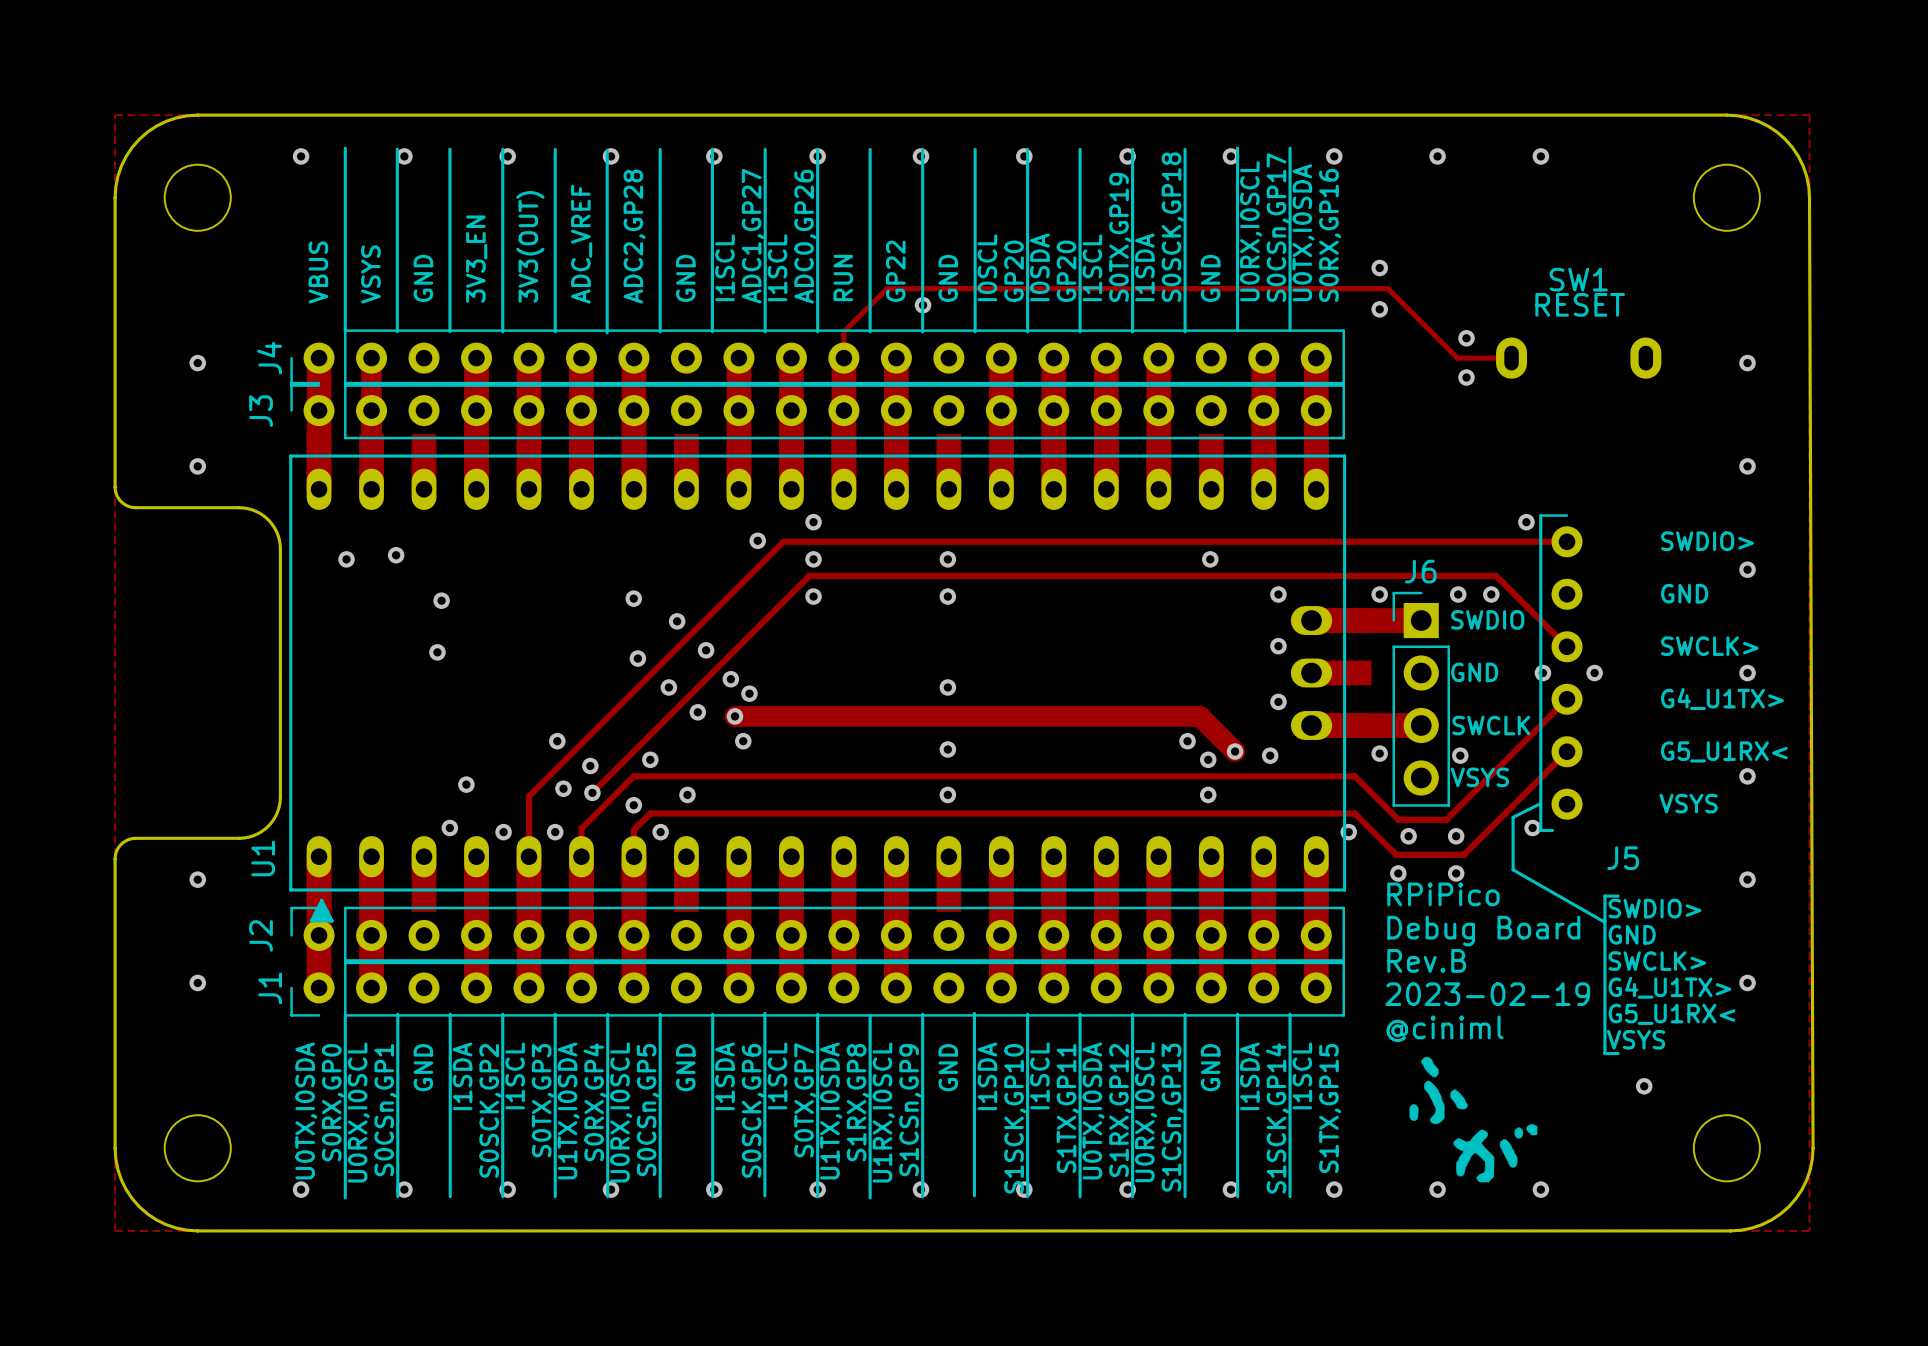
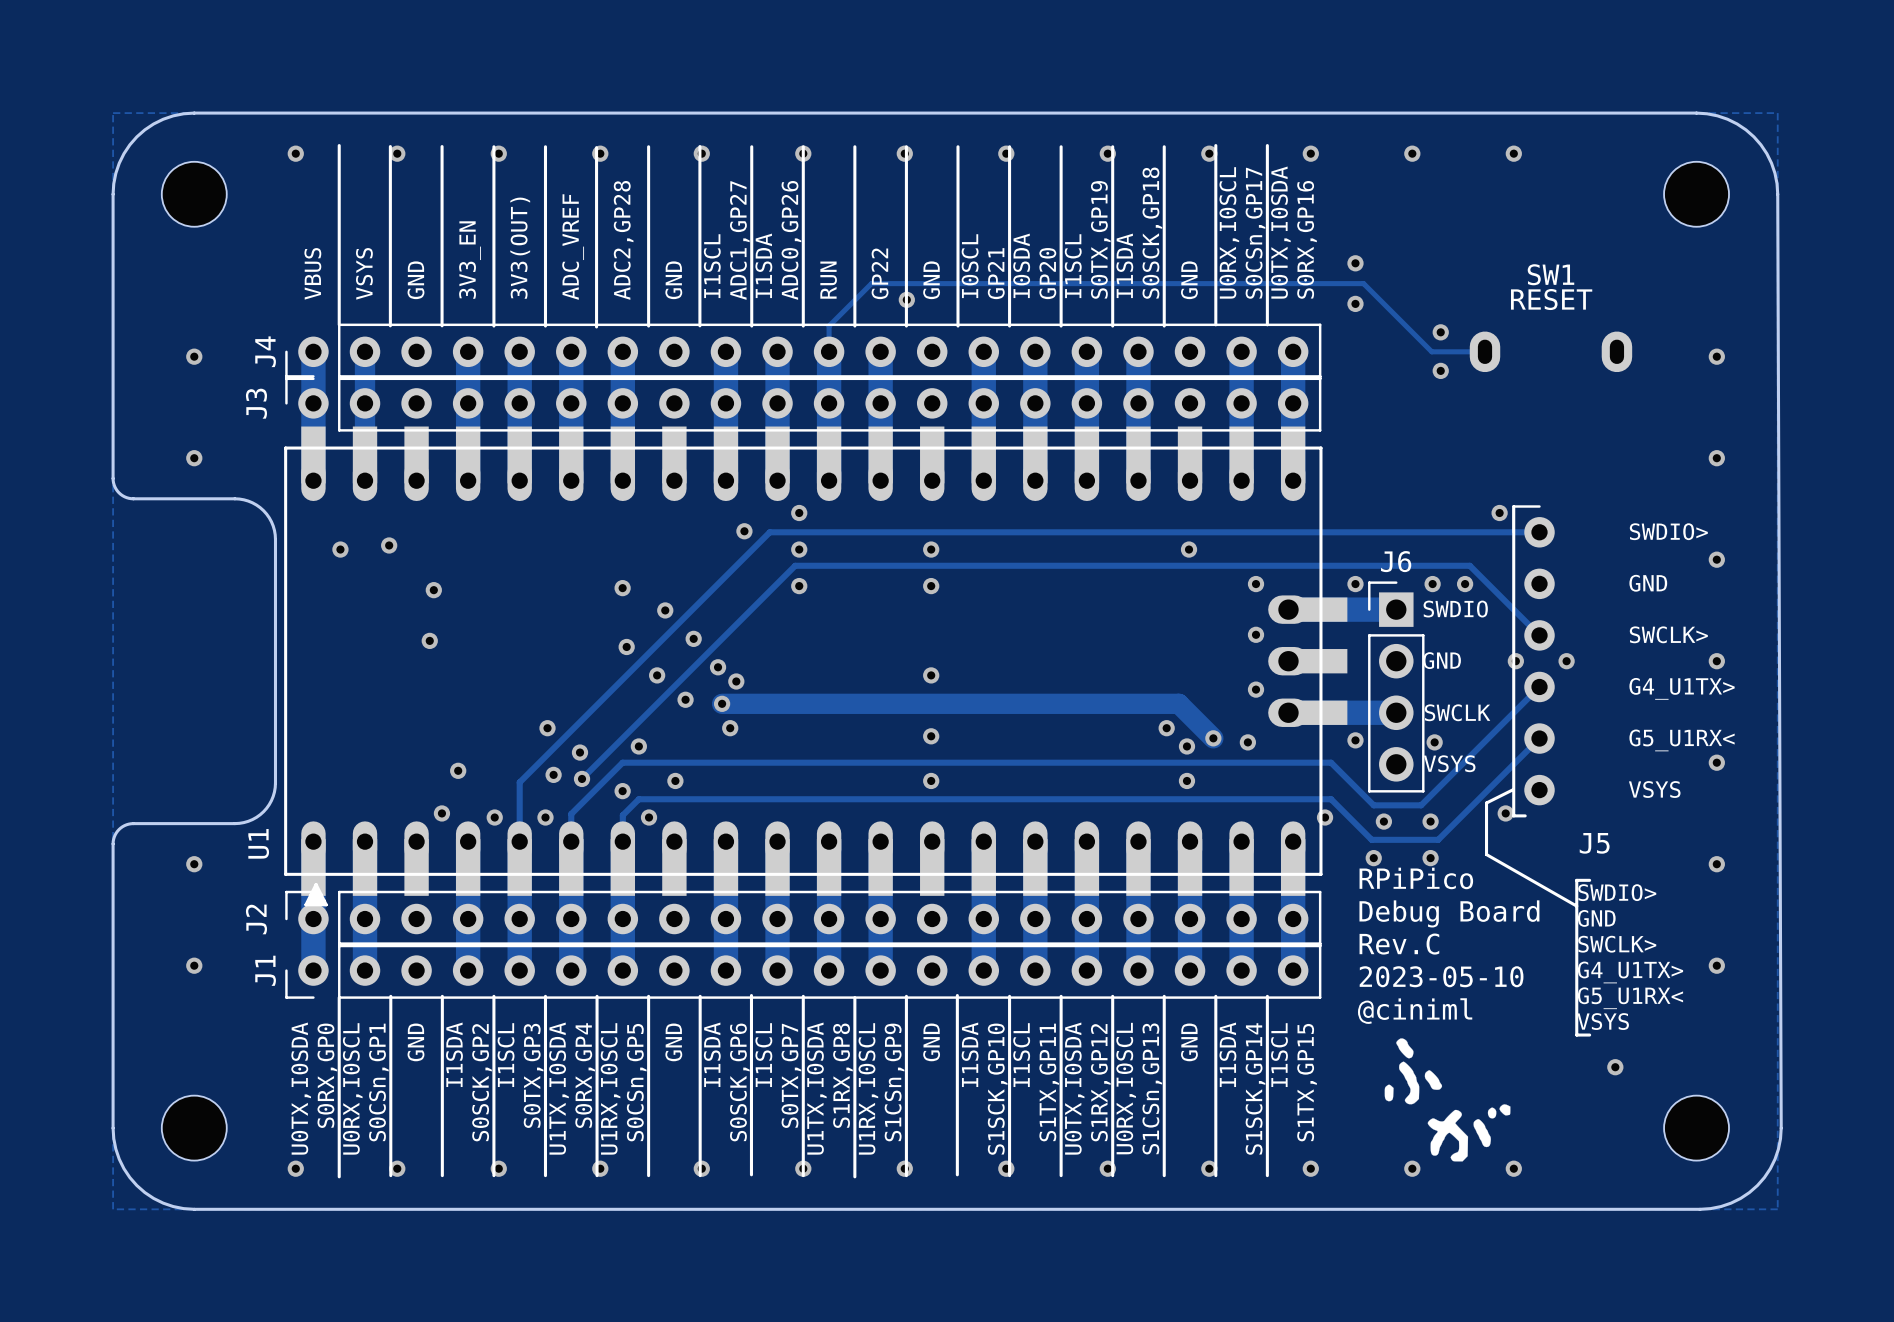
text: I1SCL (777, 267) -> I1SDA (763, 265)
text: GP20 (1014, 271) -> GP21 (996, 273)
text: Rev.B (1426, 960) -> Rev.C (1399, 944)
text: 2023-02-19 (1487, 994) -> 2023-05-10 (1441, 976)
text: U0RX,I0SCL (621, 1112) -> U1RX,I0SCL (610, 1088)

